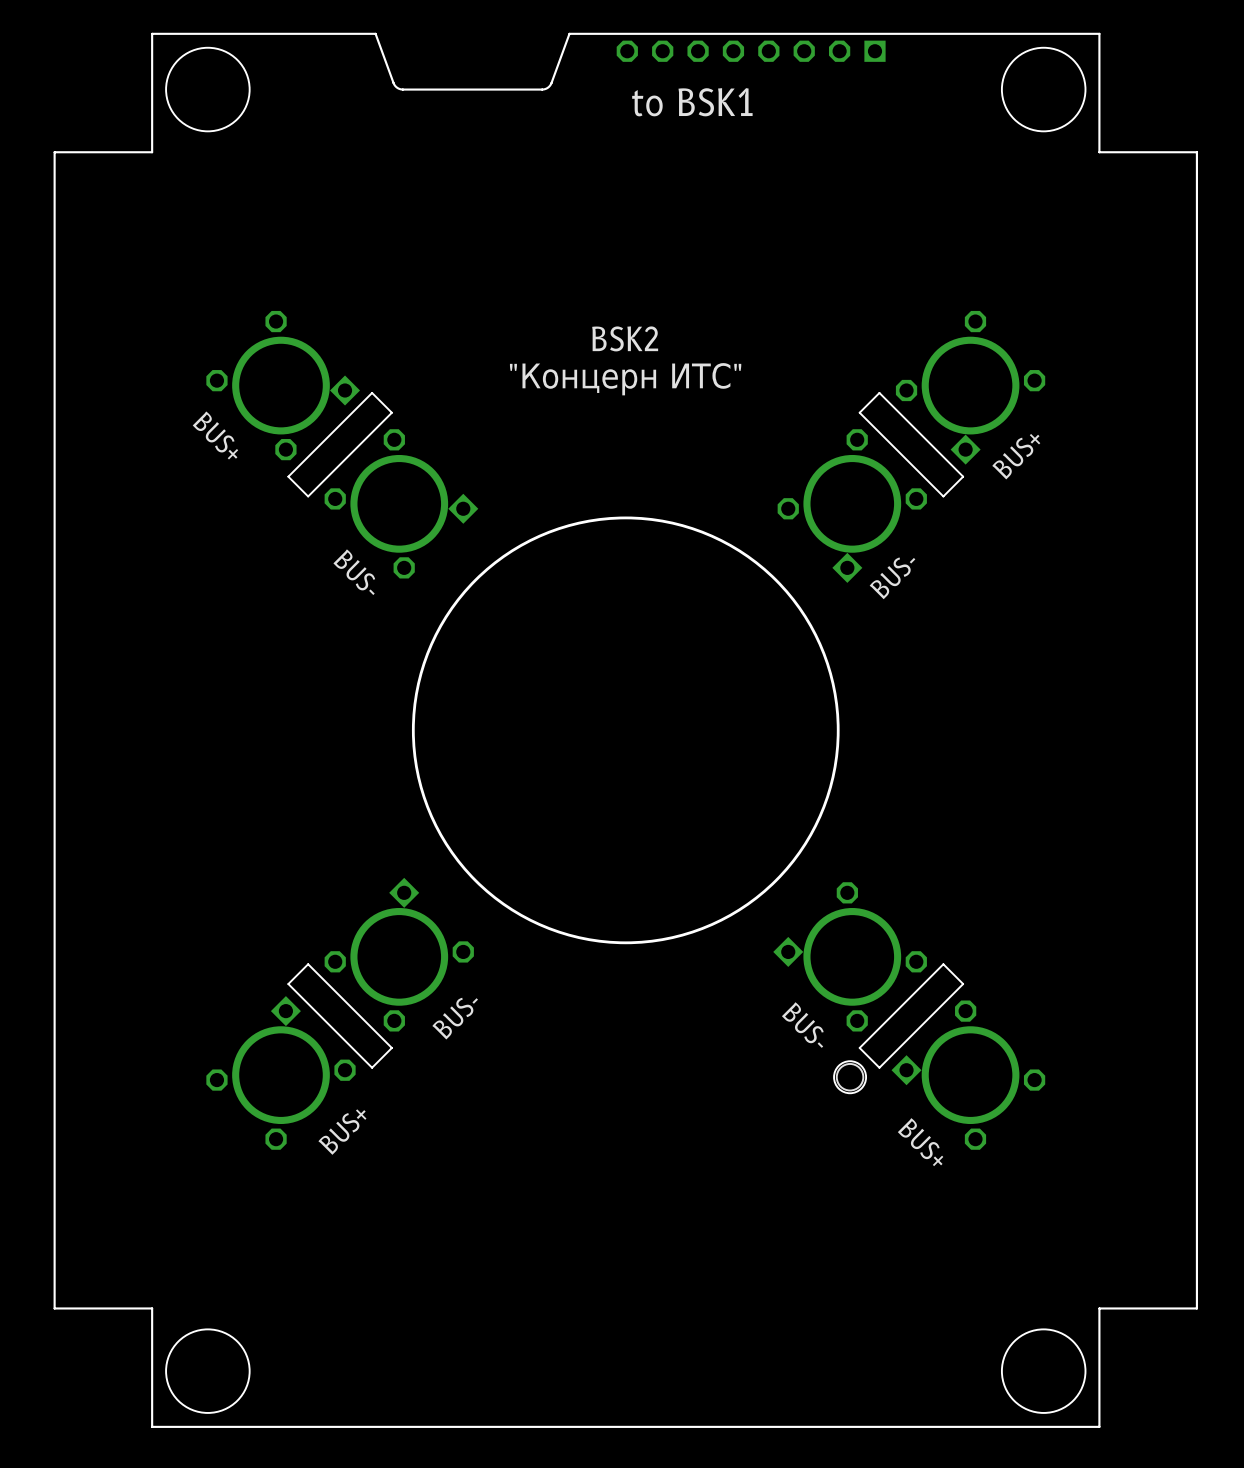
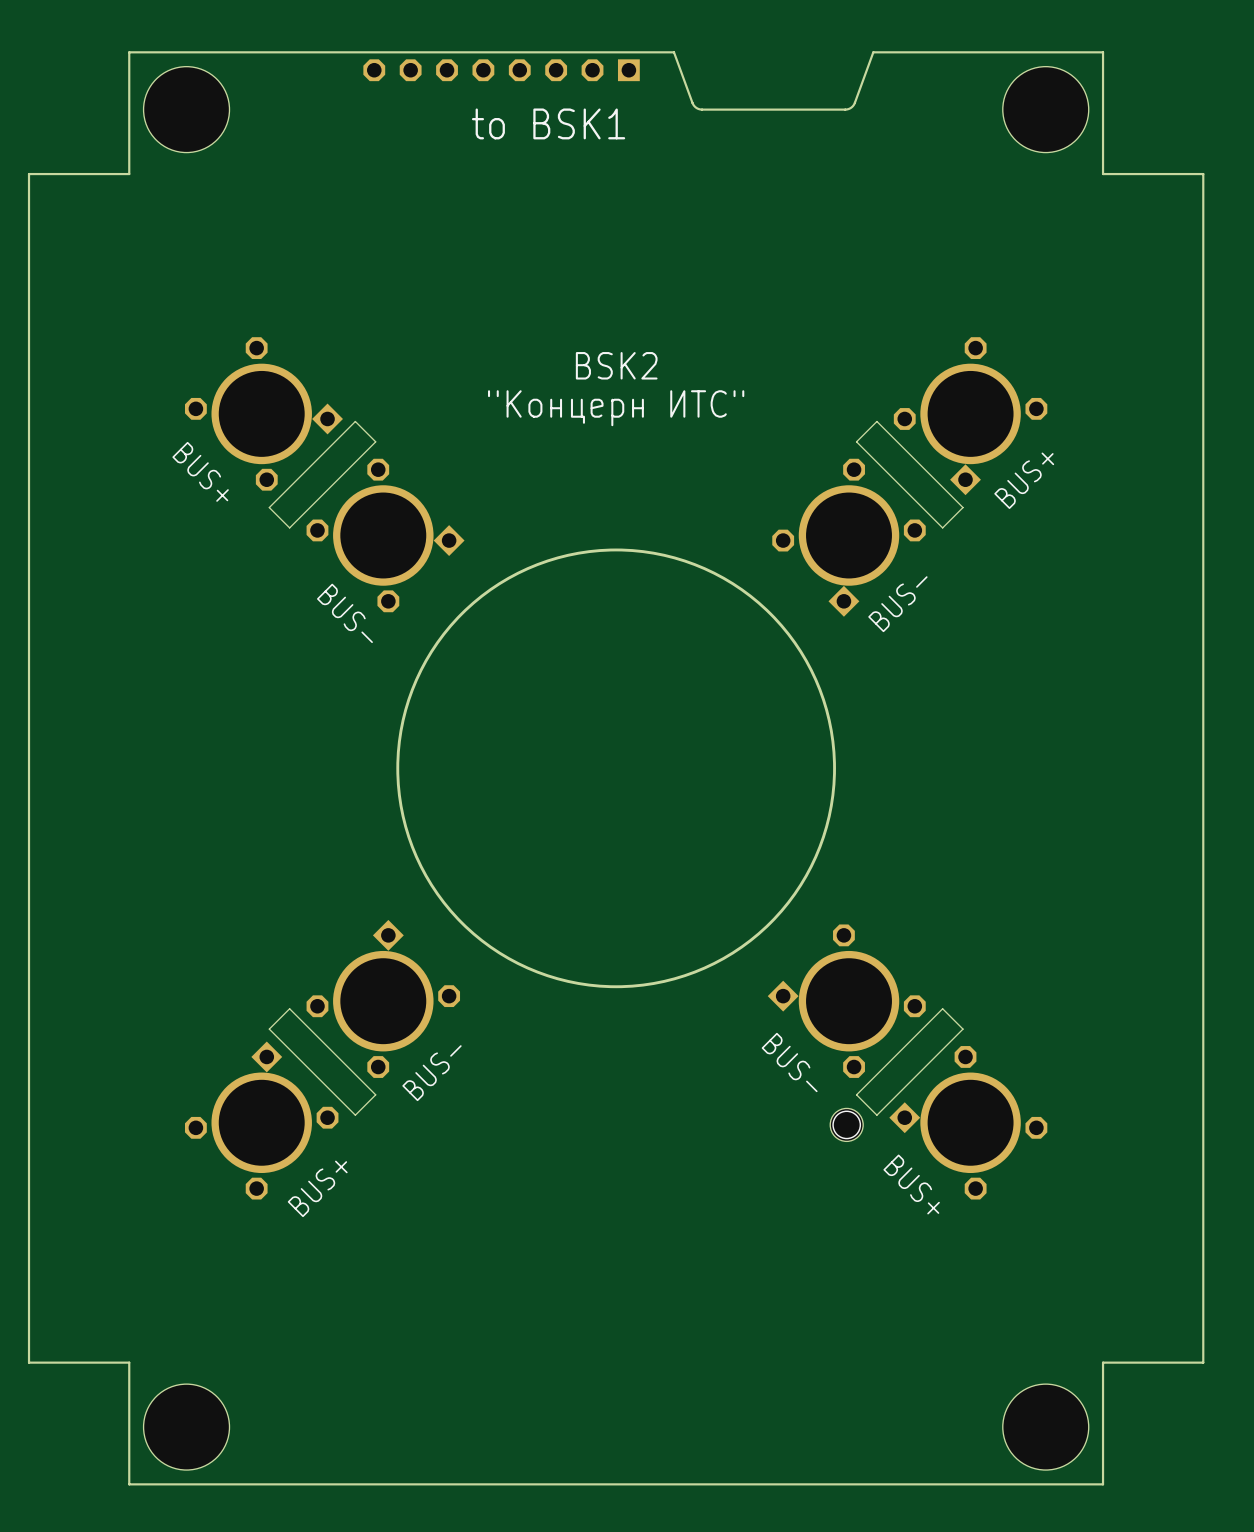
board edge: (569, 33) (551, 84) (542, 89) (399, 88) (393, 83) (375, 33) -> (558, 52) (358, 52)
board edge: (875, 33) (682, 33) -> (873, 52) (854, 104) (845, 109) (698, 108) (692, 102) (674, 52)
part position: (751, 51) -> (501, 70)
text position: to BSK1 (692, 102) -> to BSK1 (548, 123)

